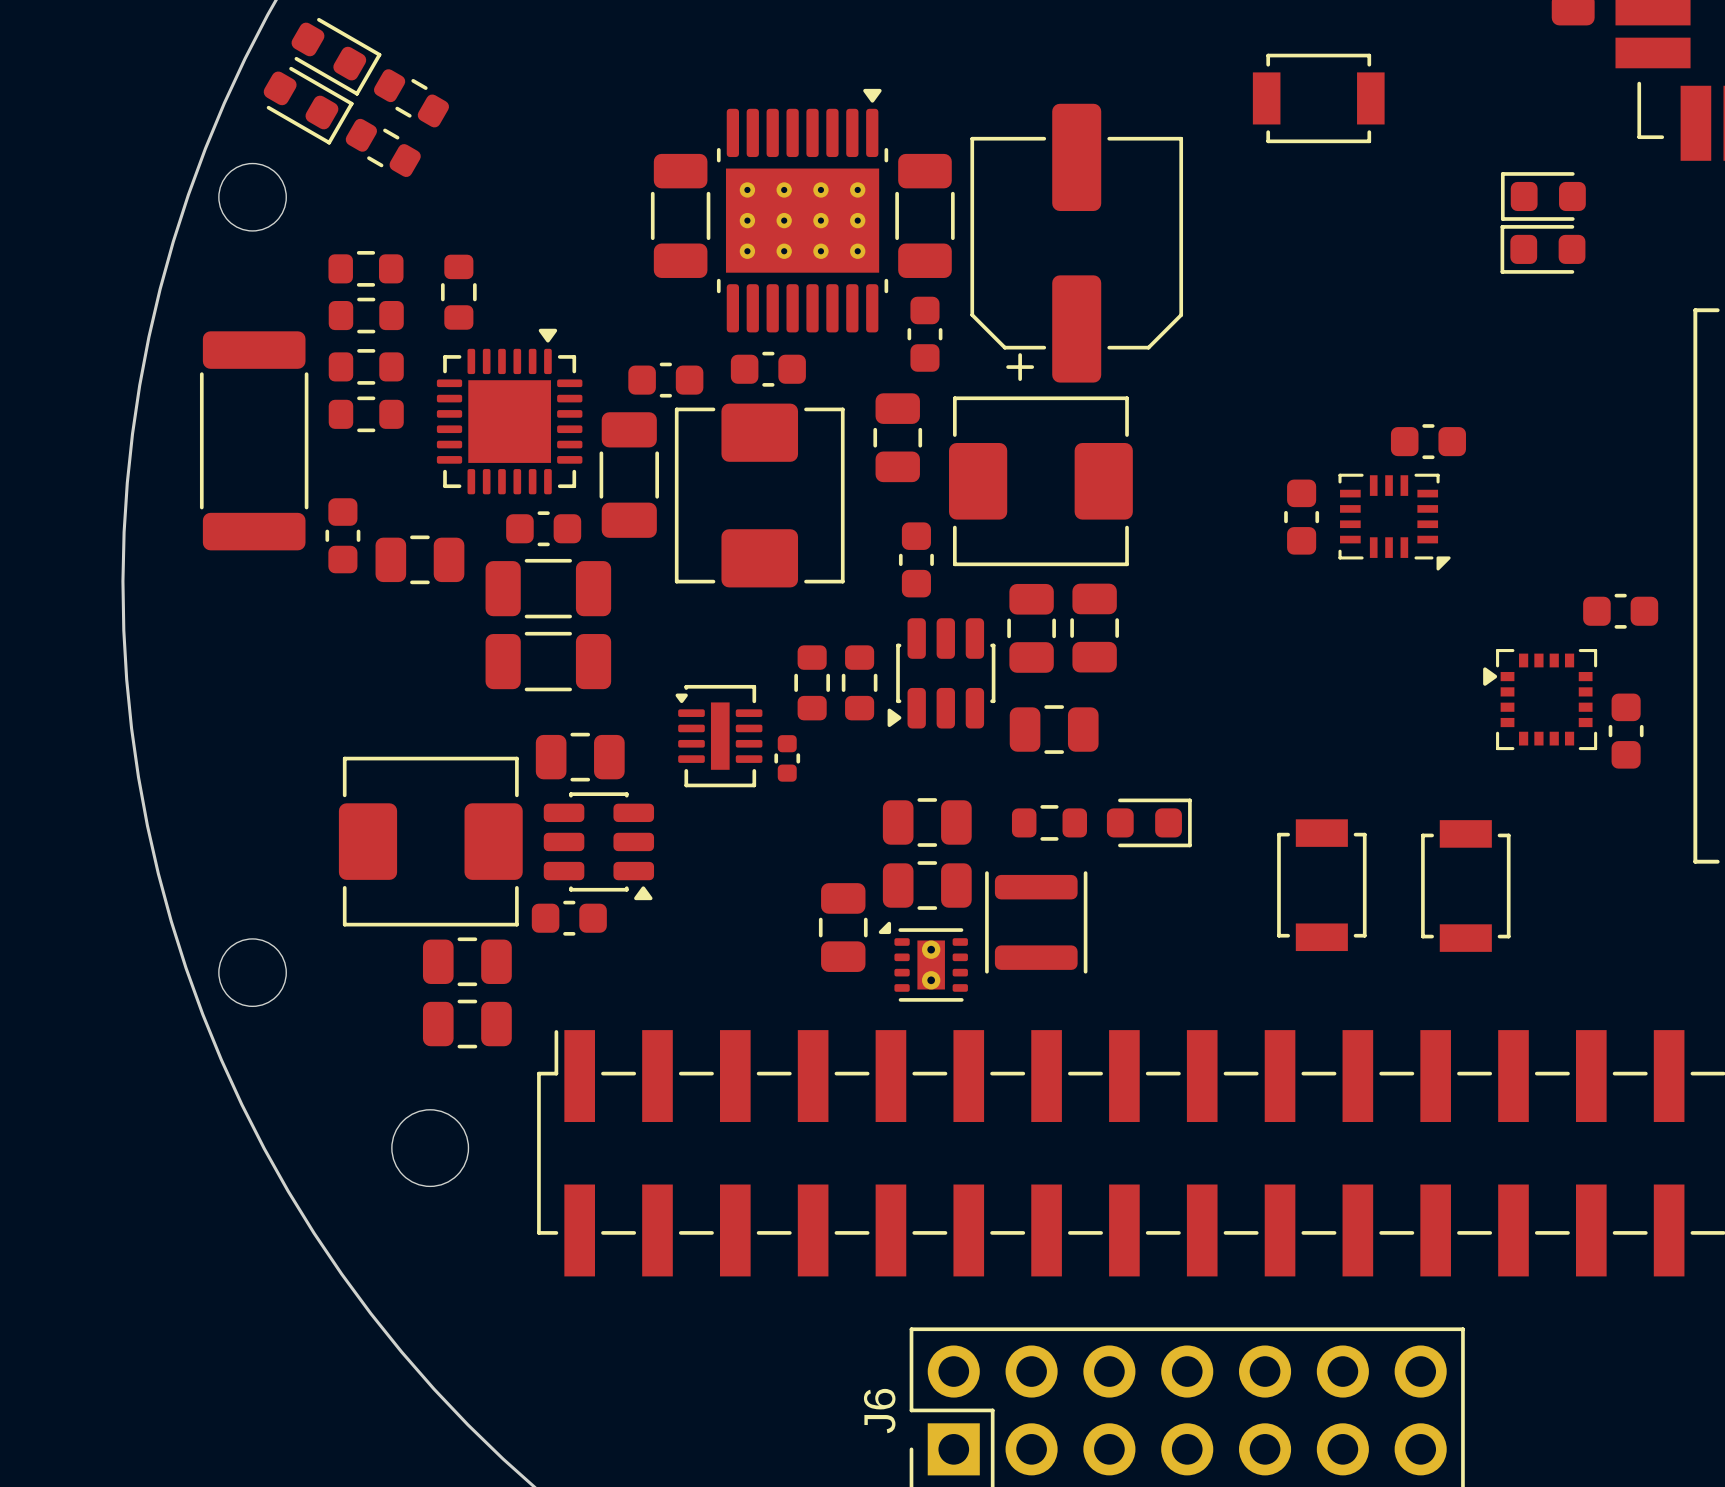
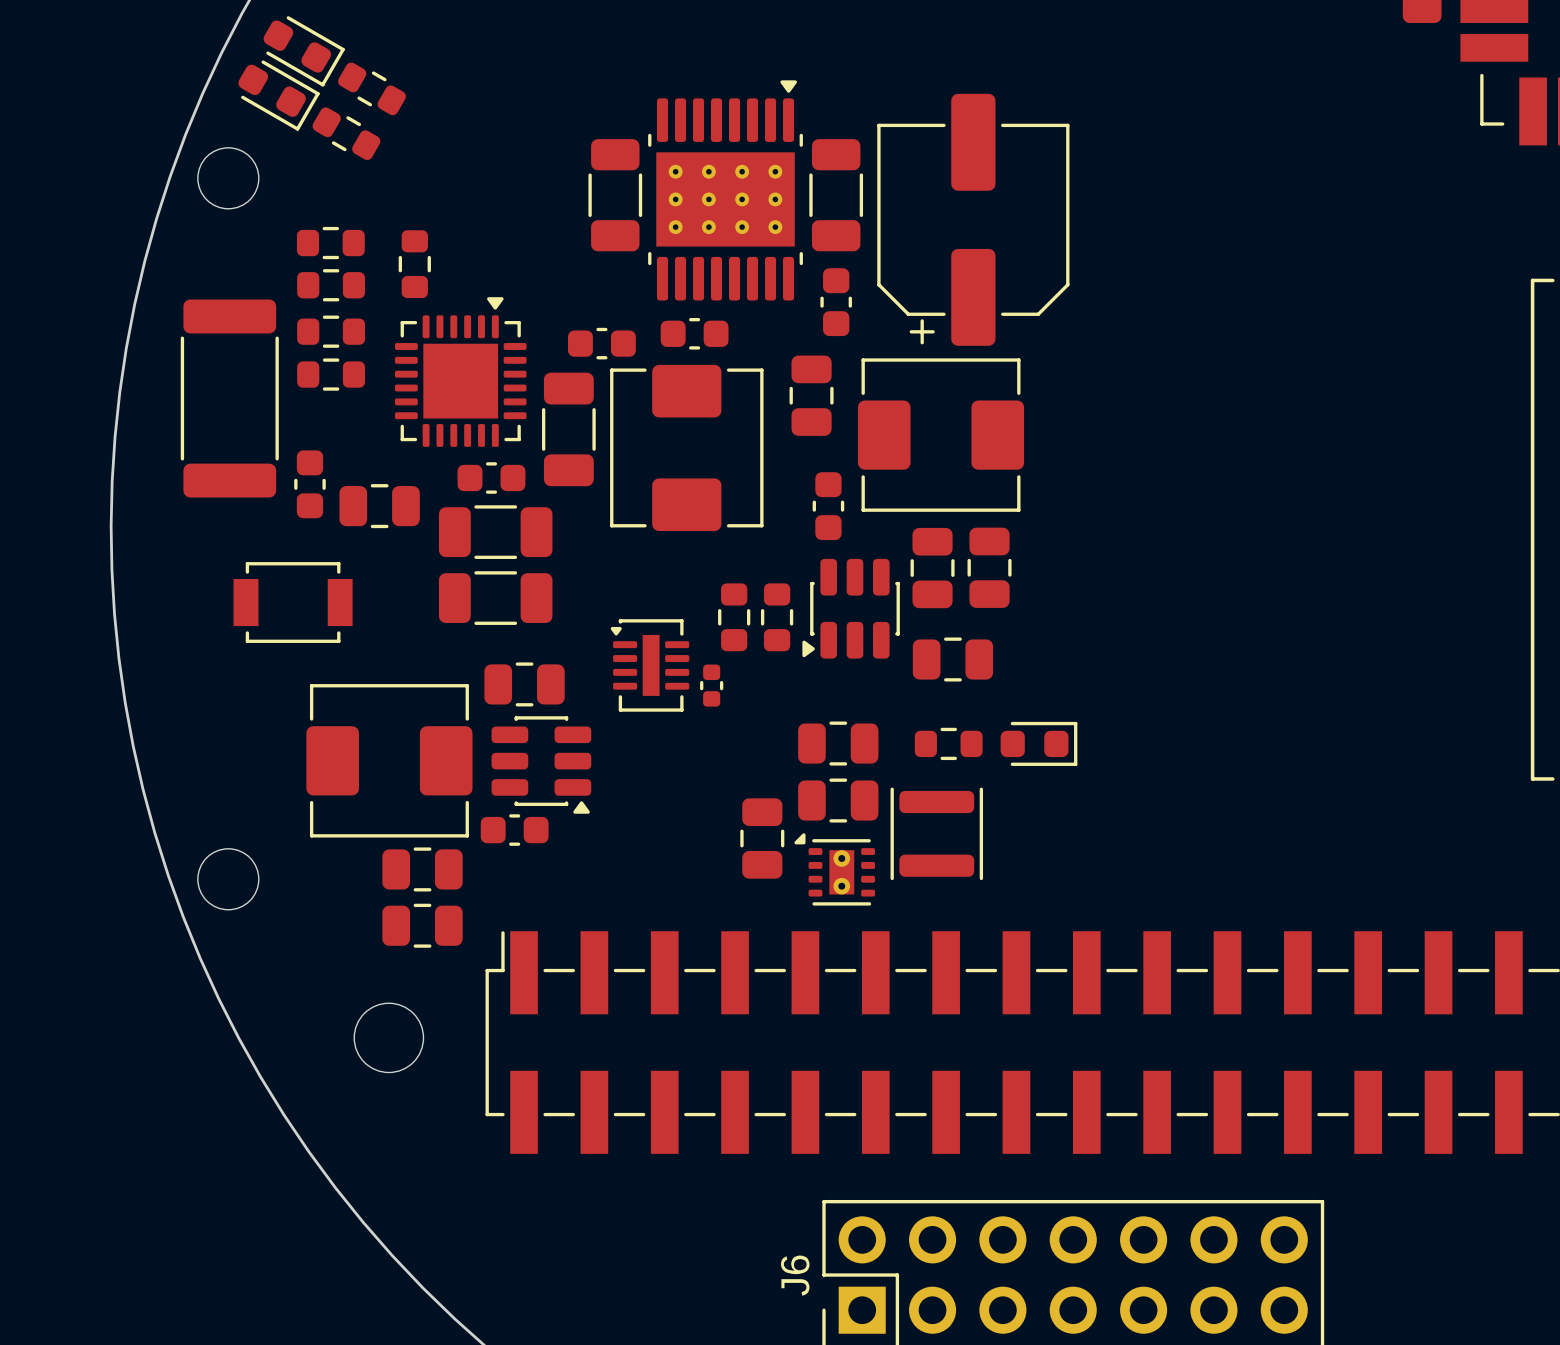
part: (1318, 98) -> none
part: (1543, 196) -> none
part: (1542, 249) -> none
part: (1428, 441) -> none
part: (1301, 517) -> none
part: (1394, 522) -> none
part: (1620, 611) -> none
part: none -> (293, 602)
part: (1540, 699) -> none
part: (1626, 731) -> none
part: (1321, 885) -> none
part: (1465, 886) -> none

